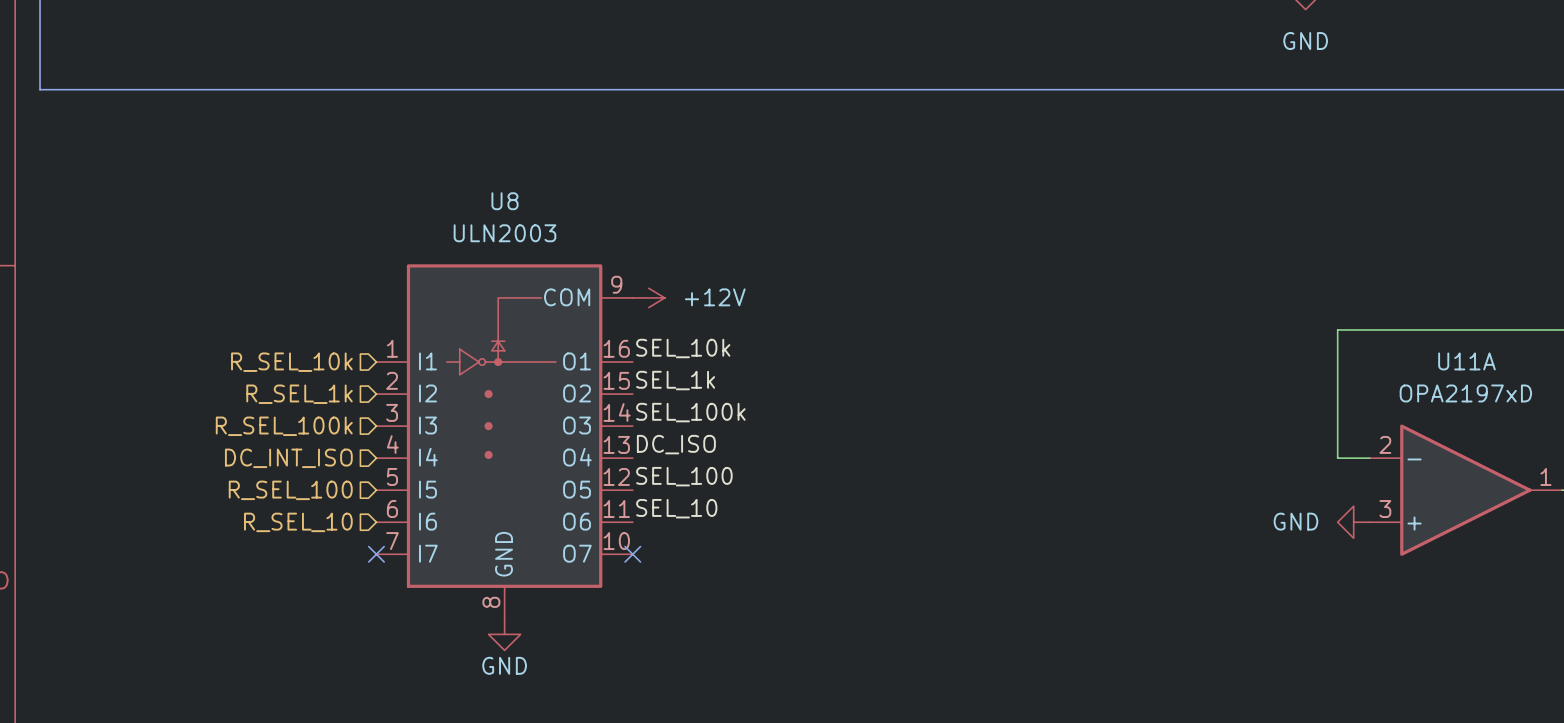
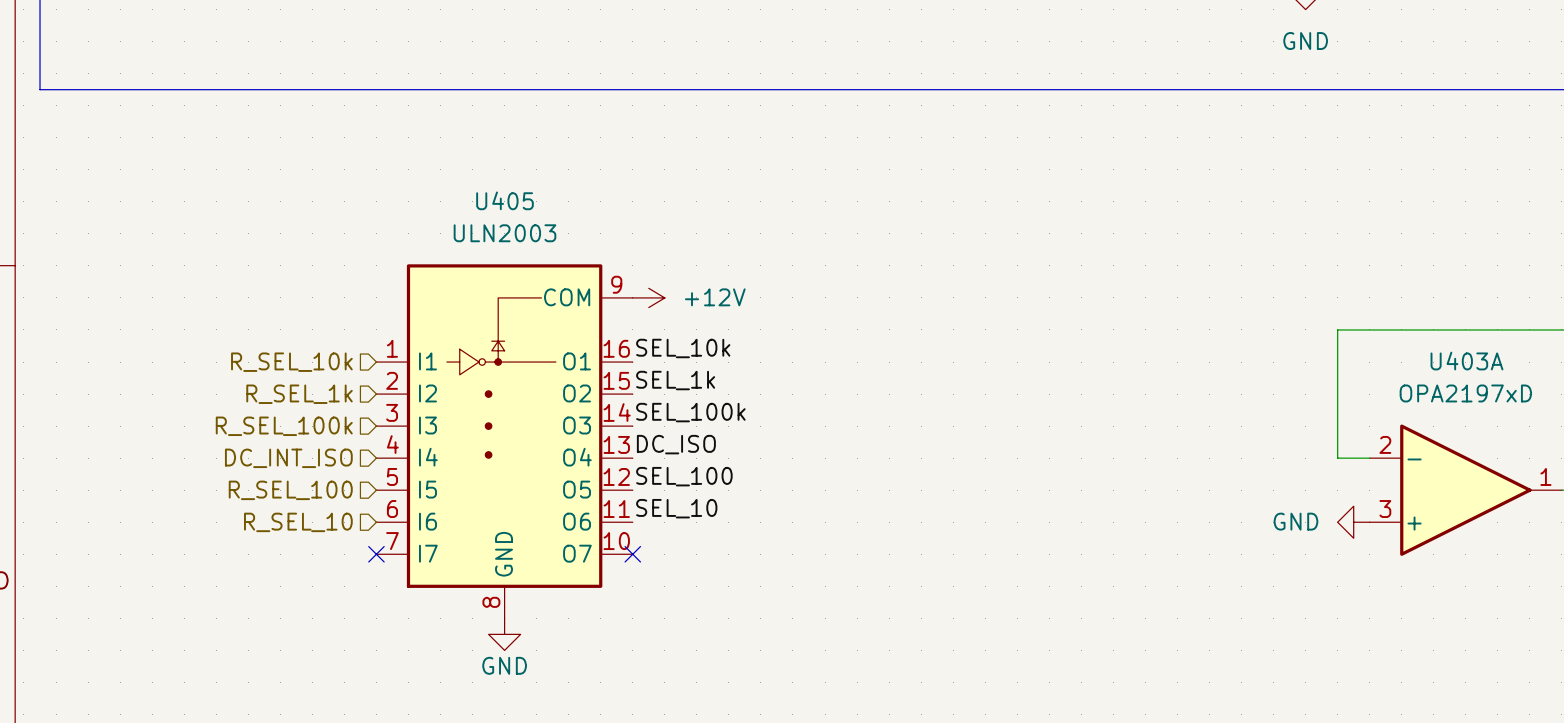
U8 name: U8 (504, 201) -> U405 (504, 200)
U11A name: U11A (1466, 361) -> U403A (1466, 361)

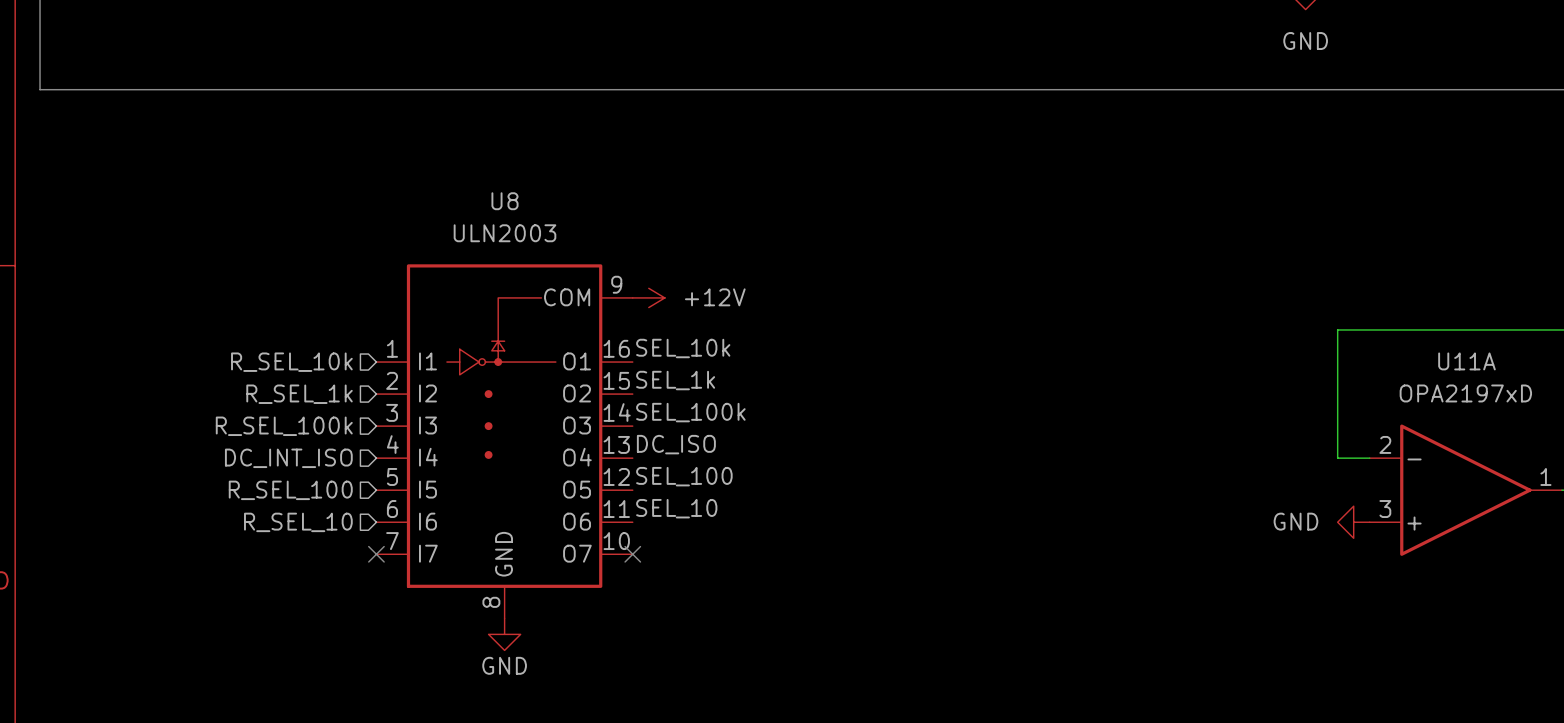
U405 name: U405 (504, 200) -> U8 (504, 201)
U403A name: U403A (1466, 361) -> U11A (1466, 361)

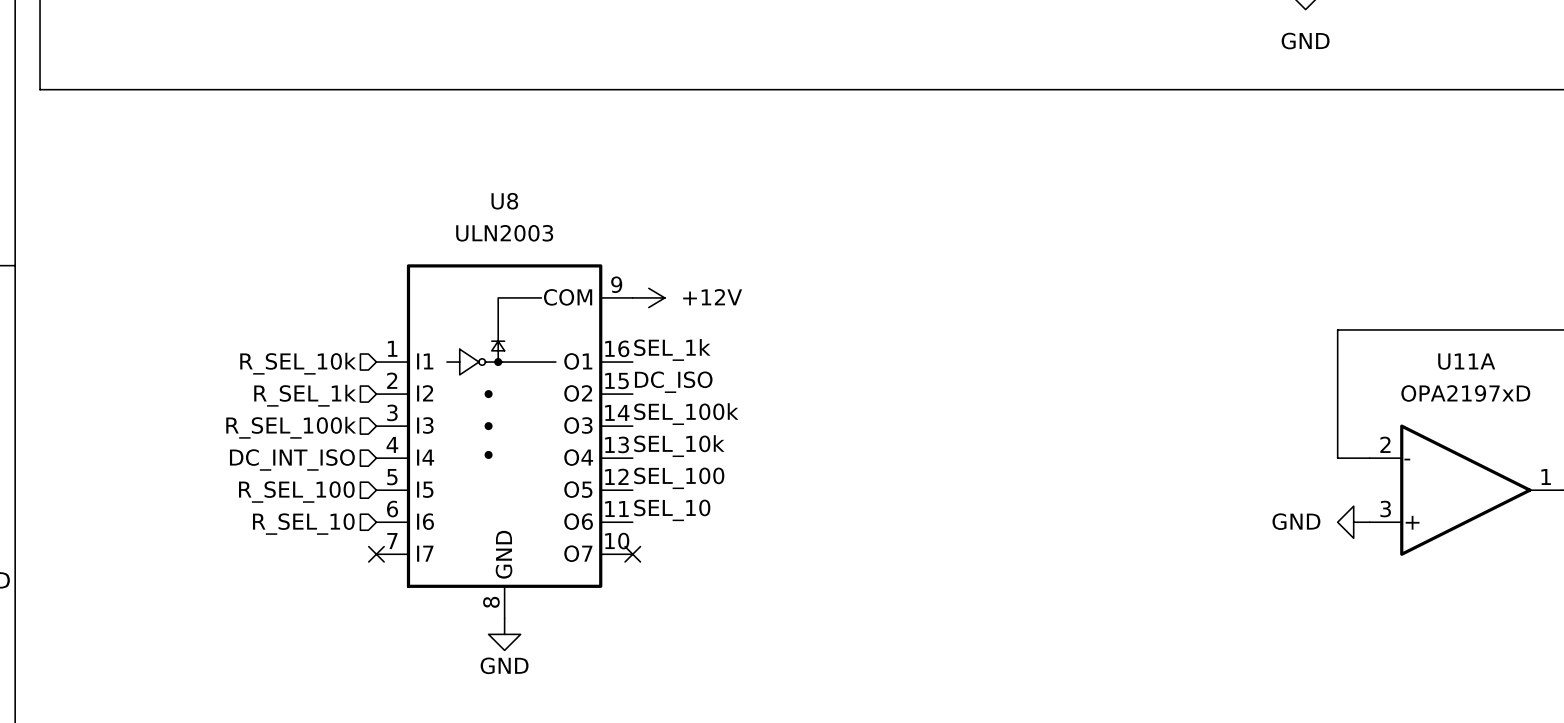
label: SEL_10k (683, 348) -> SEL_1k (672, 349)
label: SEL_1k (675, 380) -> DC_ISO (673, 382)
label: DC_ISO (676, 444) -> SEL_10k (679, 446)

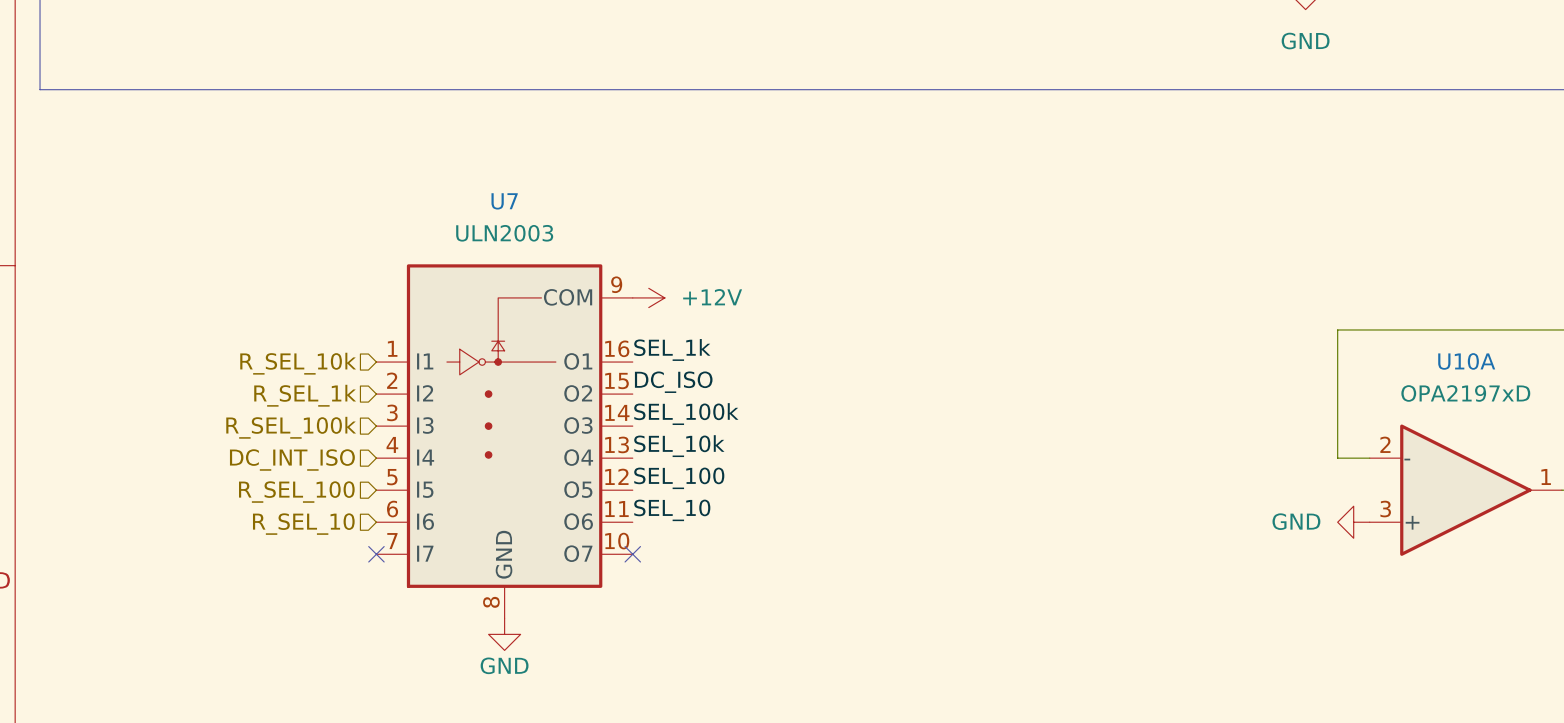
U8 name: U8 (504, 201) -> U7 (504, 201)
U11A name: U11A (1466, 361) -> U10A (1466, 361)

